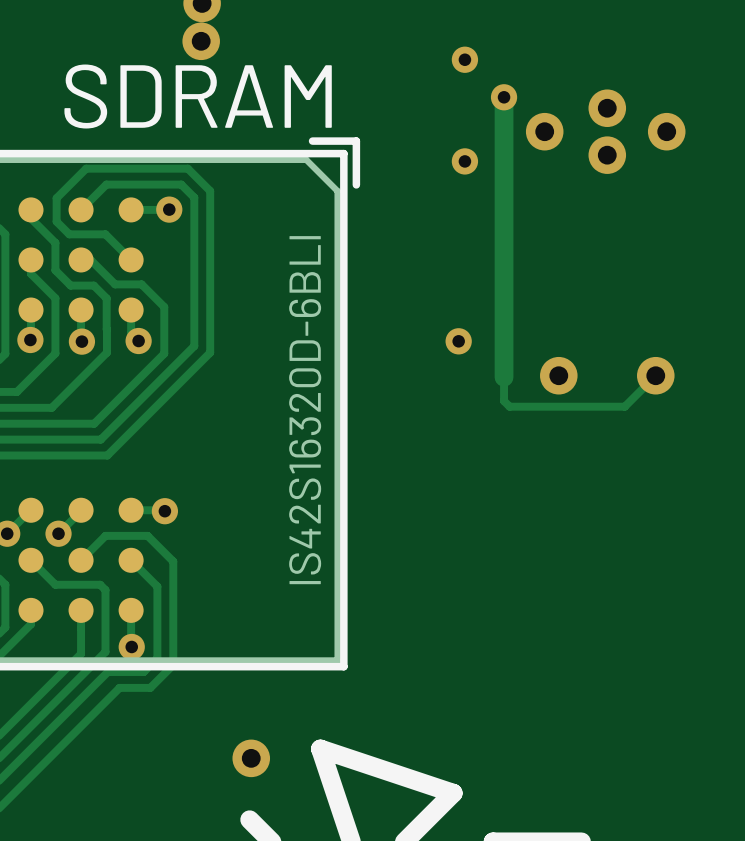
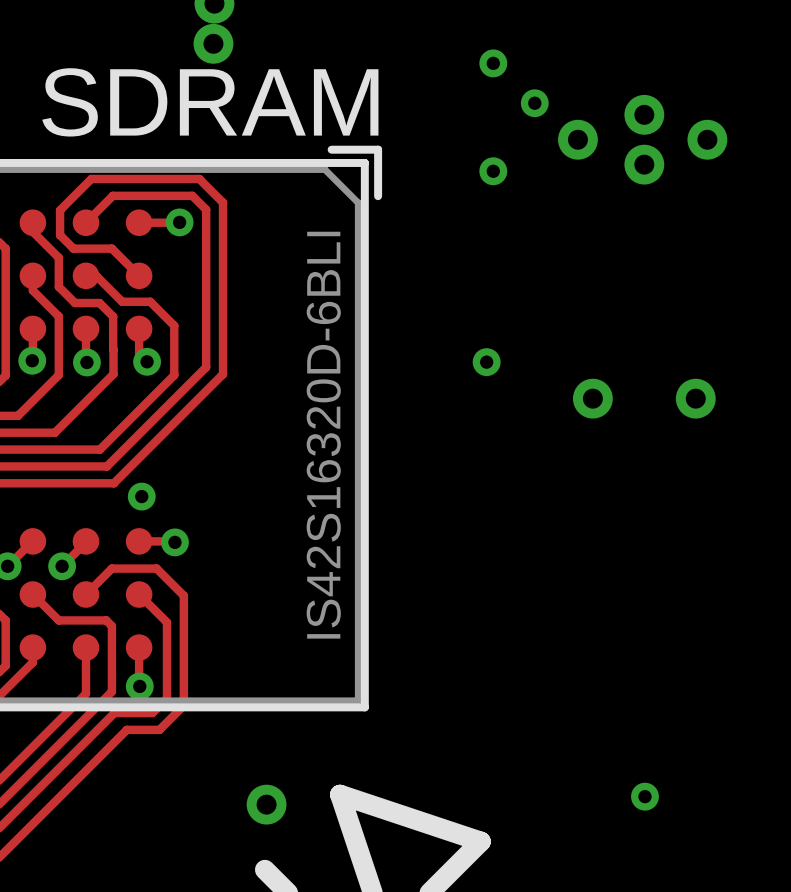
track: (504, 97) (504, 401) (509, 406) (624, 406) (655, 375) -> none
via: none -> (141, 496)
via: none -> (645, 796)

